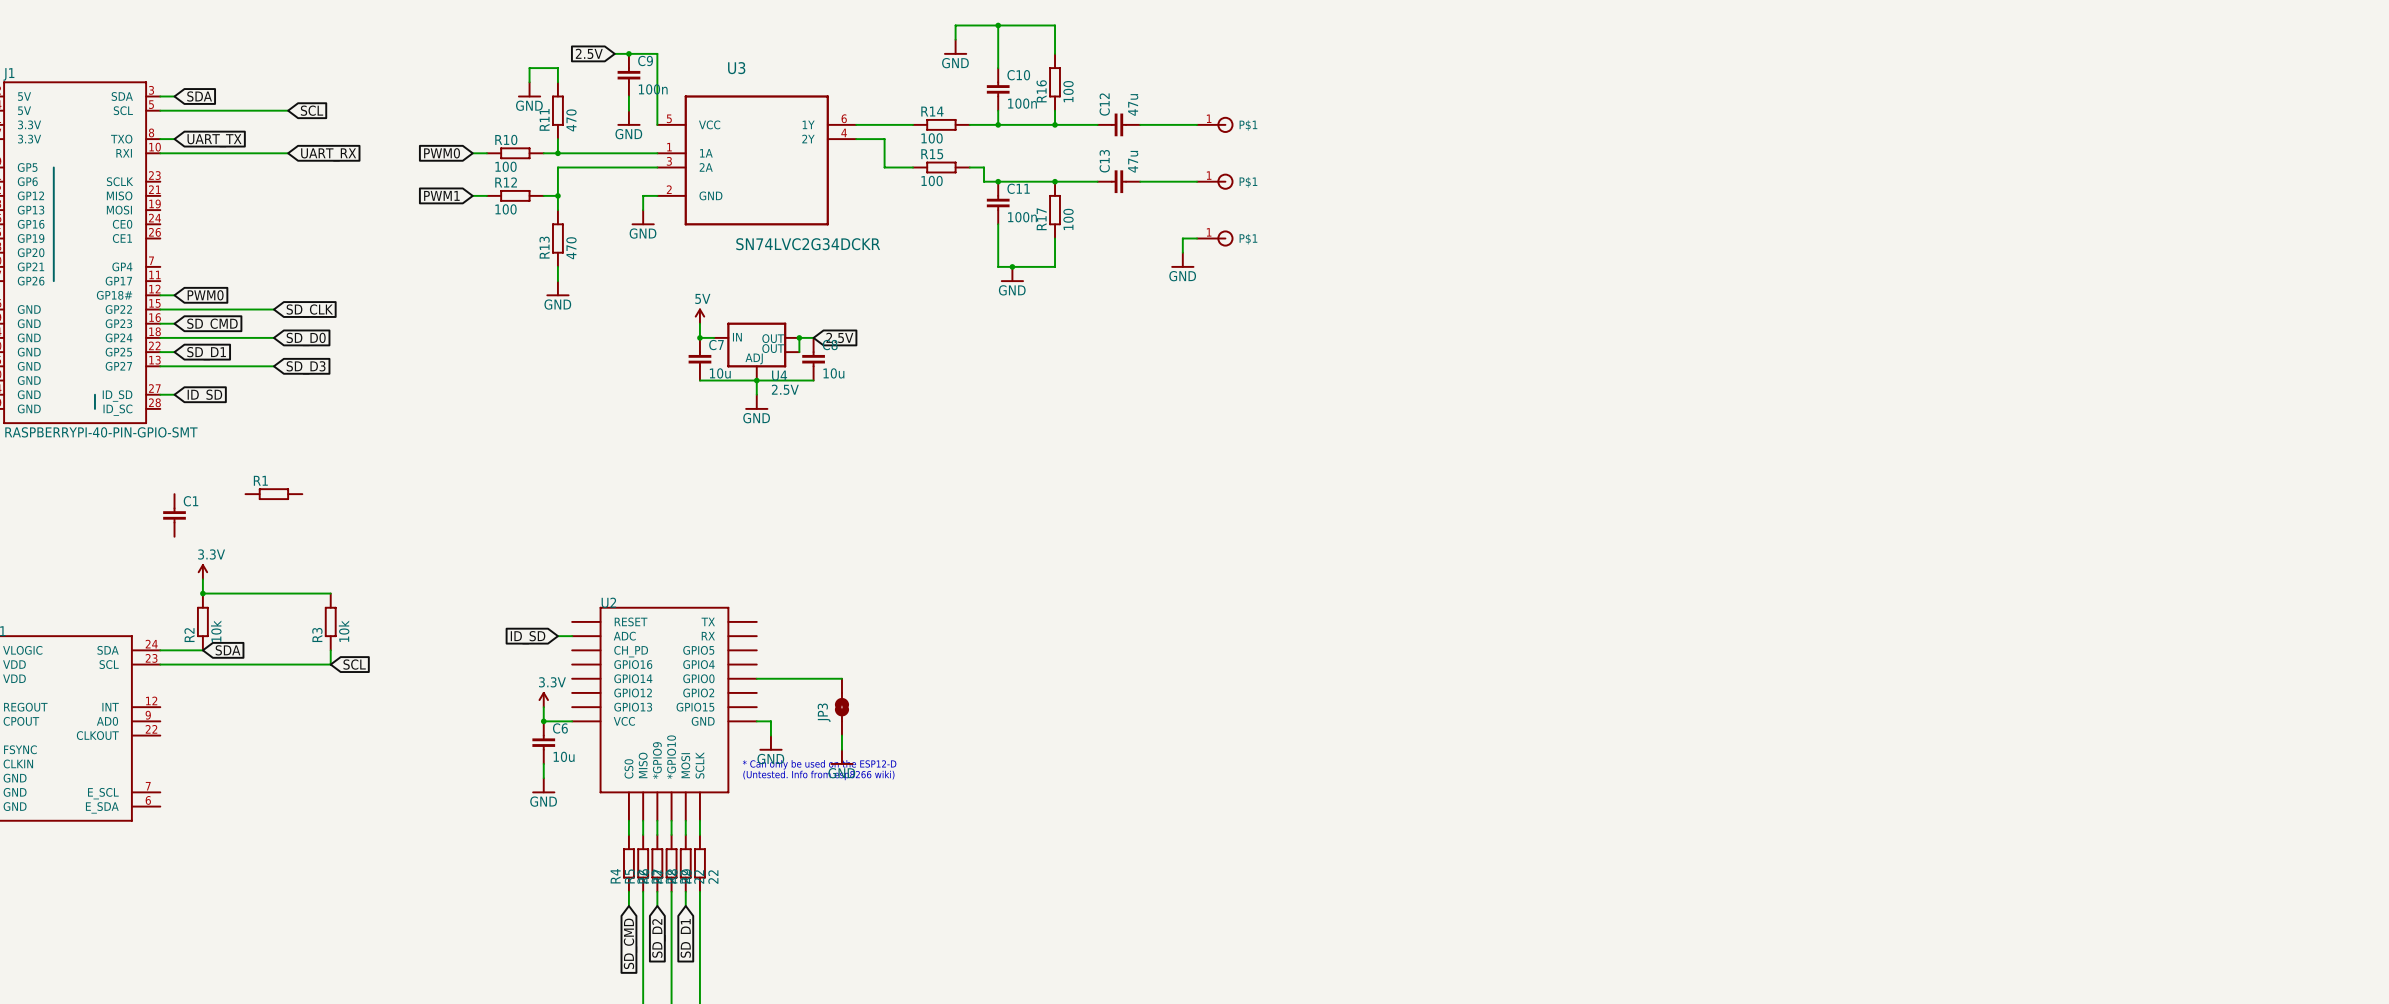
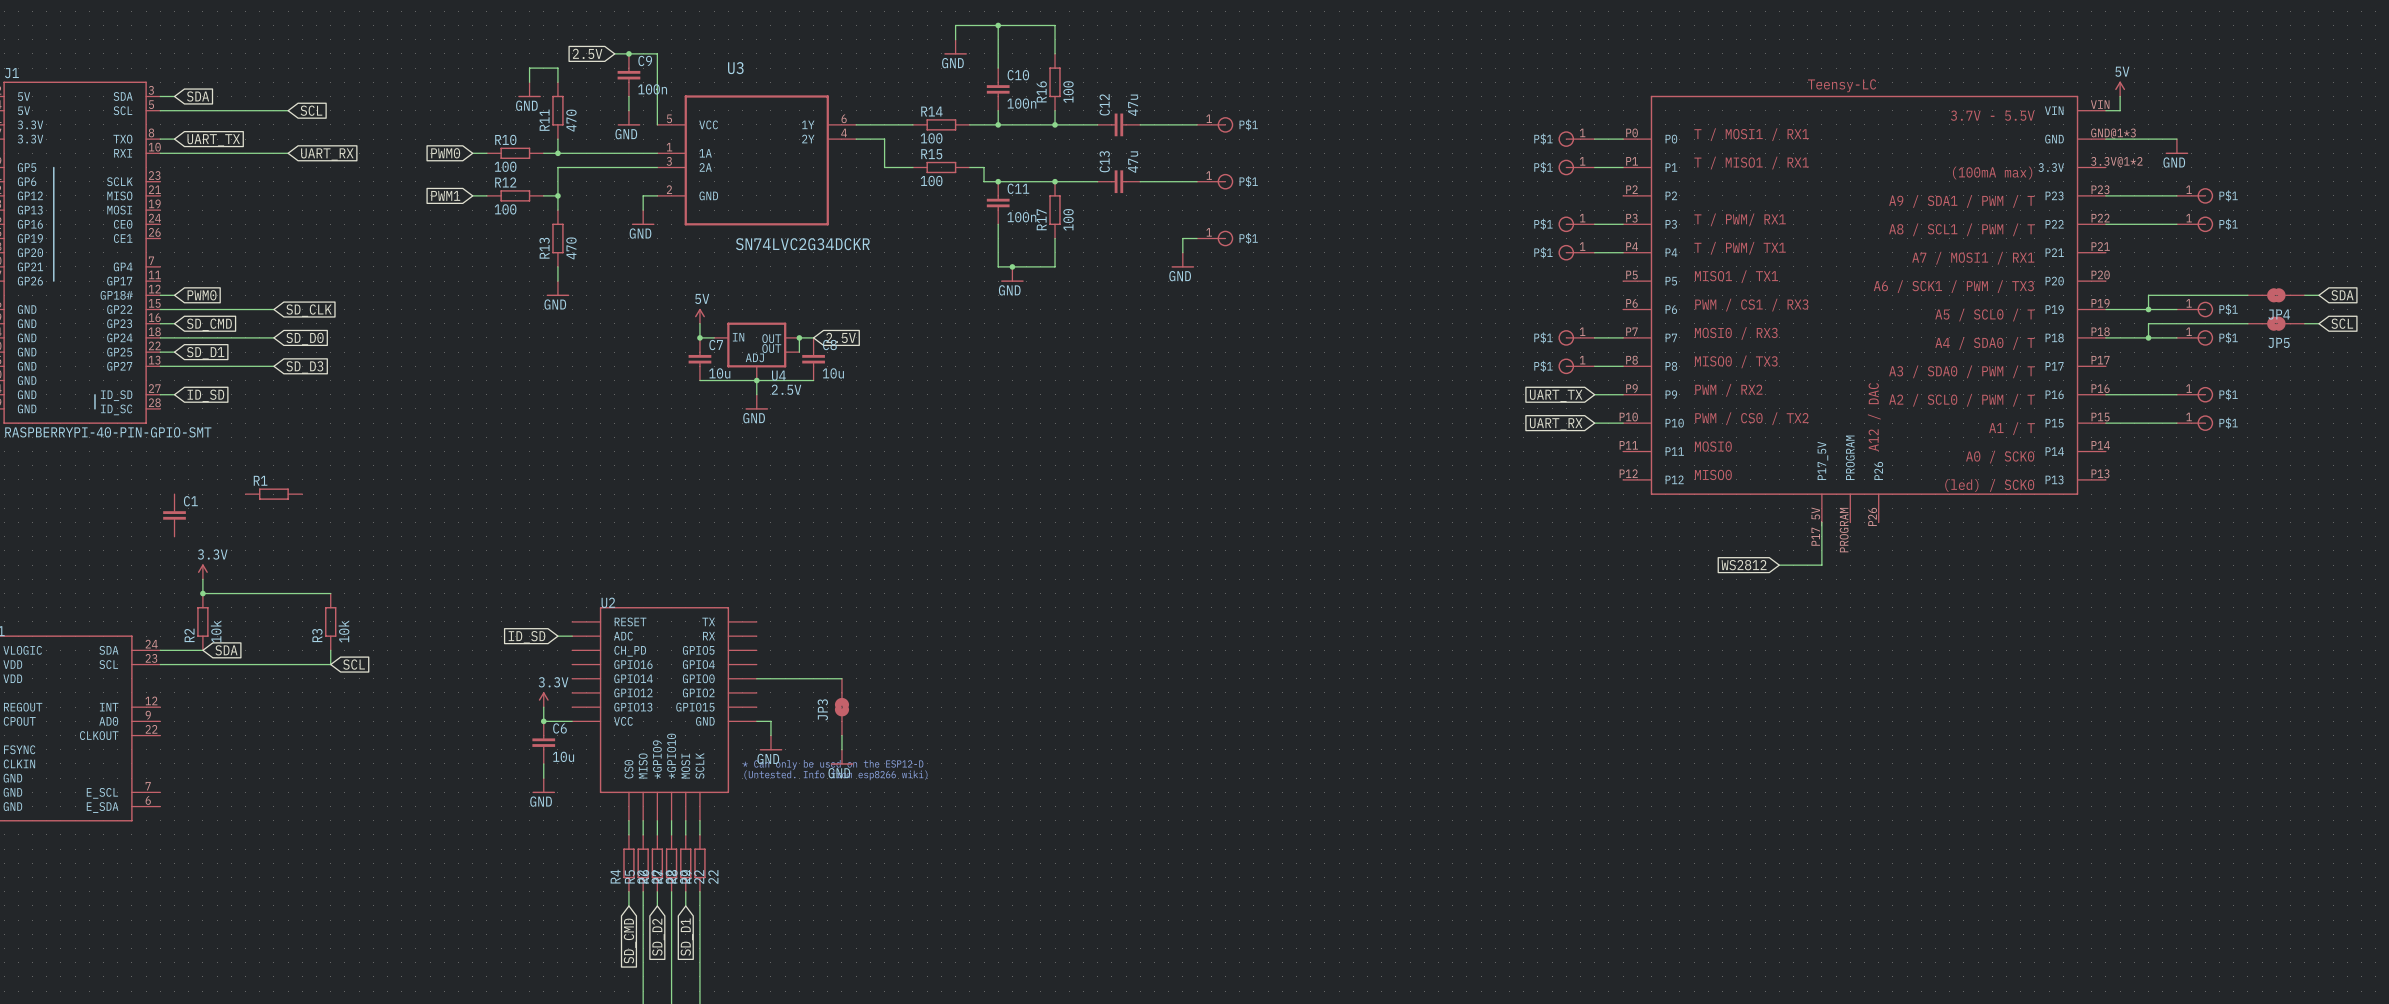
power symbol: none -> 5V (2120, 89)
wire: none -> (2120, 96) (2120, 110) (2105, 110)
part: none -> (1576, 139)
wire: none -> (1594, 139) (1623, 139)
wire: none -> (2105, 139) (2176, 139)
power symbol: none -> GND (2176, 146)
part: none -> (1576, 167)
wire: none -> (1594, 167) (1623, 167)
wire: none -> (2105, 195) (2176, 195)
part: none -> (2195, 195)
part: none -> (1576, 224)
wire: none -> (1594, 224) (1623, 224)
wire: none -> (2105, 224) (2176, 224)
part: none -> (2195, 224)
part: none -> (1576, 252)
wire: none -> (1594, 252) (1623, 252)
wire: none -> (2247, 295) (2148, 295) (2148, 309)
JP4: none -> (2276, 295)
wire: none -> (2304, 295) (2318, 295)
global label: none -> SDA (2342, 295)
part: none -> (1864, 309)
wire: none -> (2105, 309) (2176, 309)
junction: none -> (2148, 309)
part: none -> (2195, 309)
wire: none -> (2247, 323) (2148, 323) (2148, 337)
JP5: none -> (2276, 323)
wire: none -> (2304, 323) (2318, 323)
global label: none -> SCL (2342, 323)
part: none -> (1576, 337)
wire: none -> (1594, 337) (1623, 337)
wire: none -> (2105, 337) (2176, 337)
junction: none -> (2148, 337)
part: none -> (2195, 337)
part: none -> (1576, 366)
wire: none -> (1594, 366) (1623, 366)
wire: none -> (1594, 394) (1623, 394)
wire: none -> (2105, 394) (2176, 394)
part: none -> (2195, 394)
global label: none -> UART_TX (1556, 395)
wire: none -> (1594, 423) (1623, 423)
wire: none -> (2105, 423) (2176, 423)
part: none -> (2195, 423)
global label: none -> UART_RX (1556, 424)
wire: none -> (1821, 522) (1821, 565) (1779, 565)
global label: none -> WS2812 (1744, 565)

